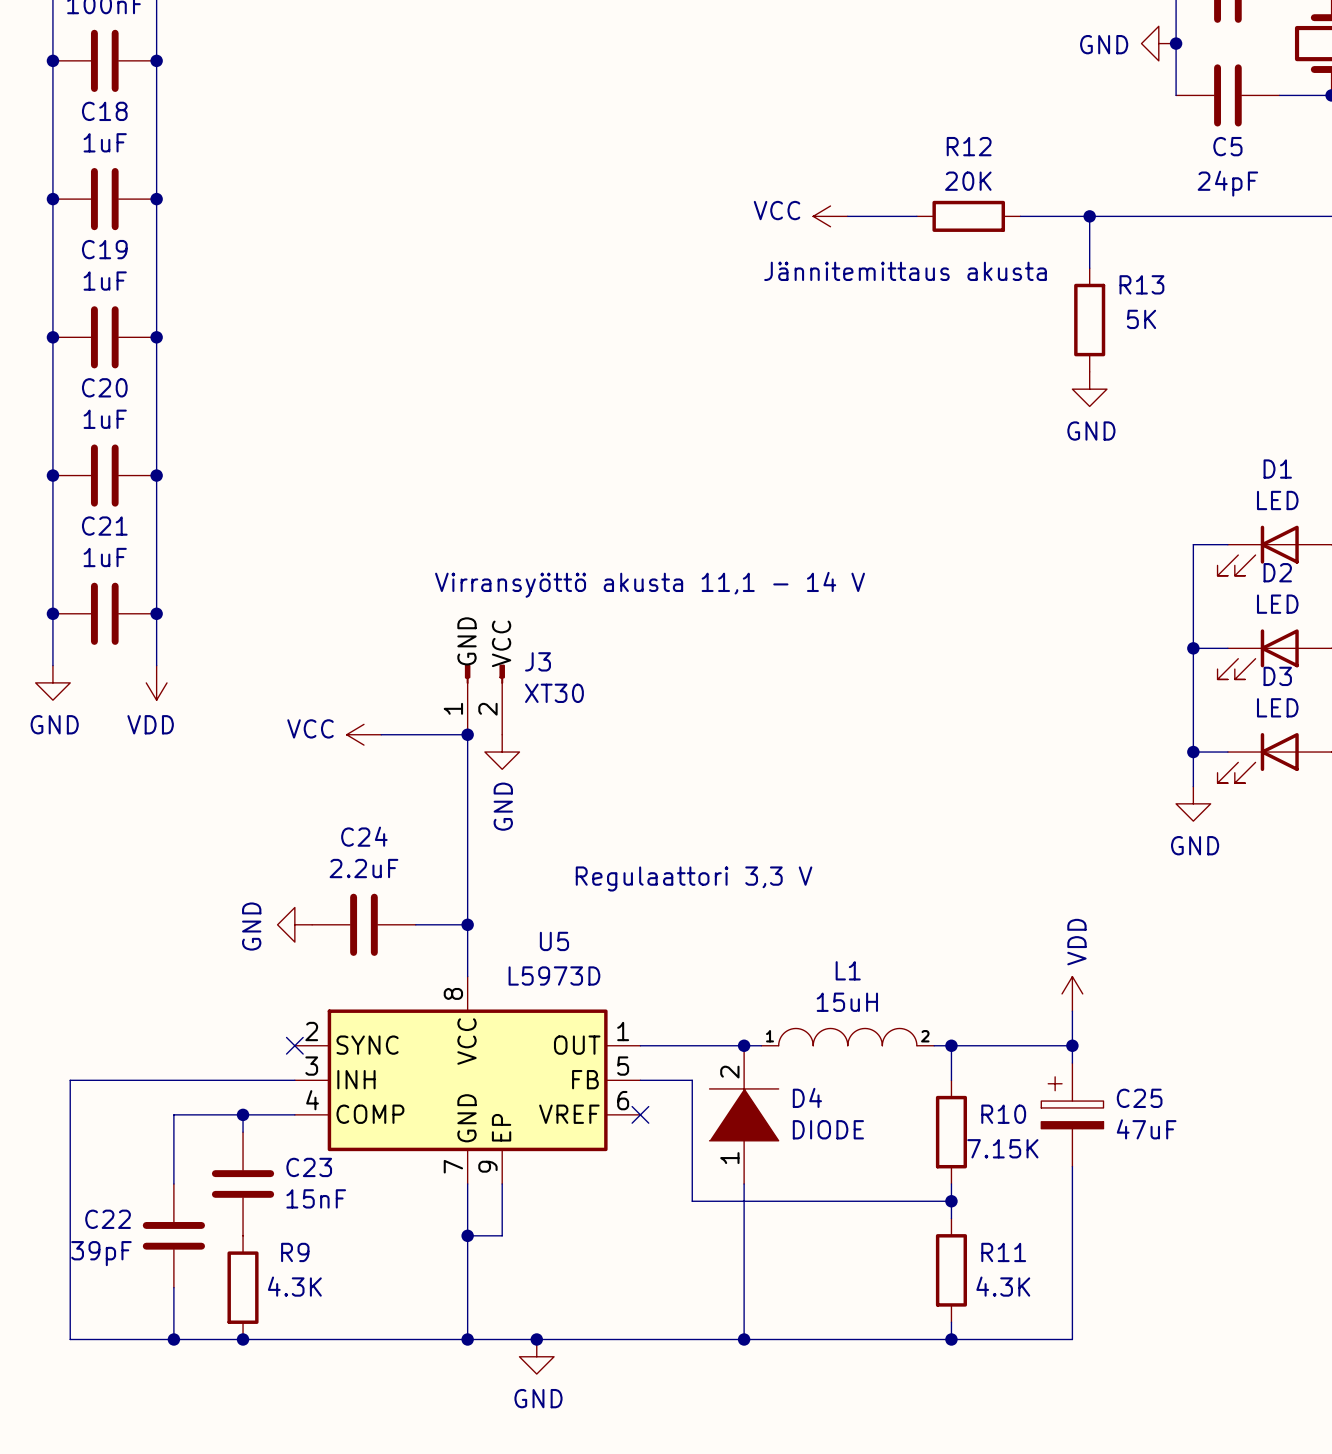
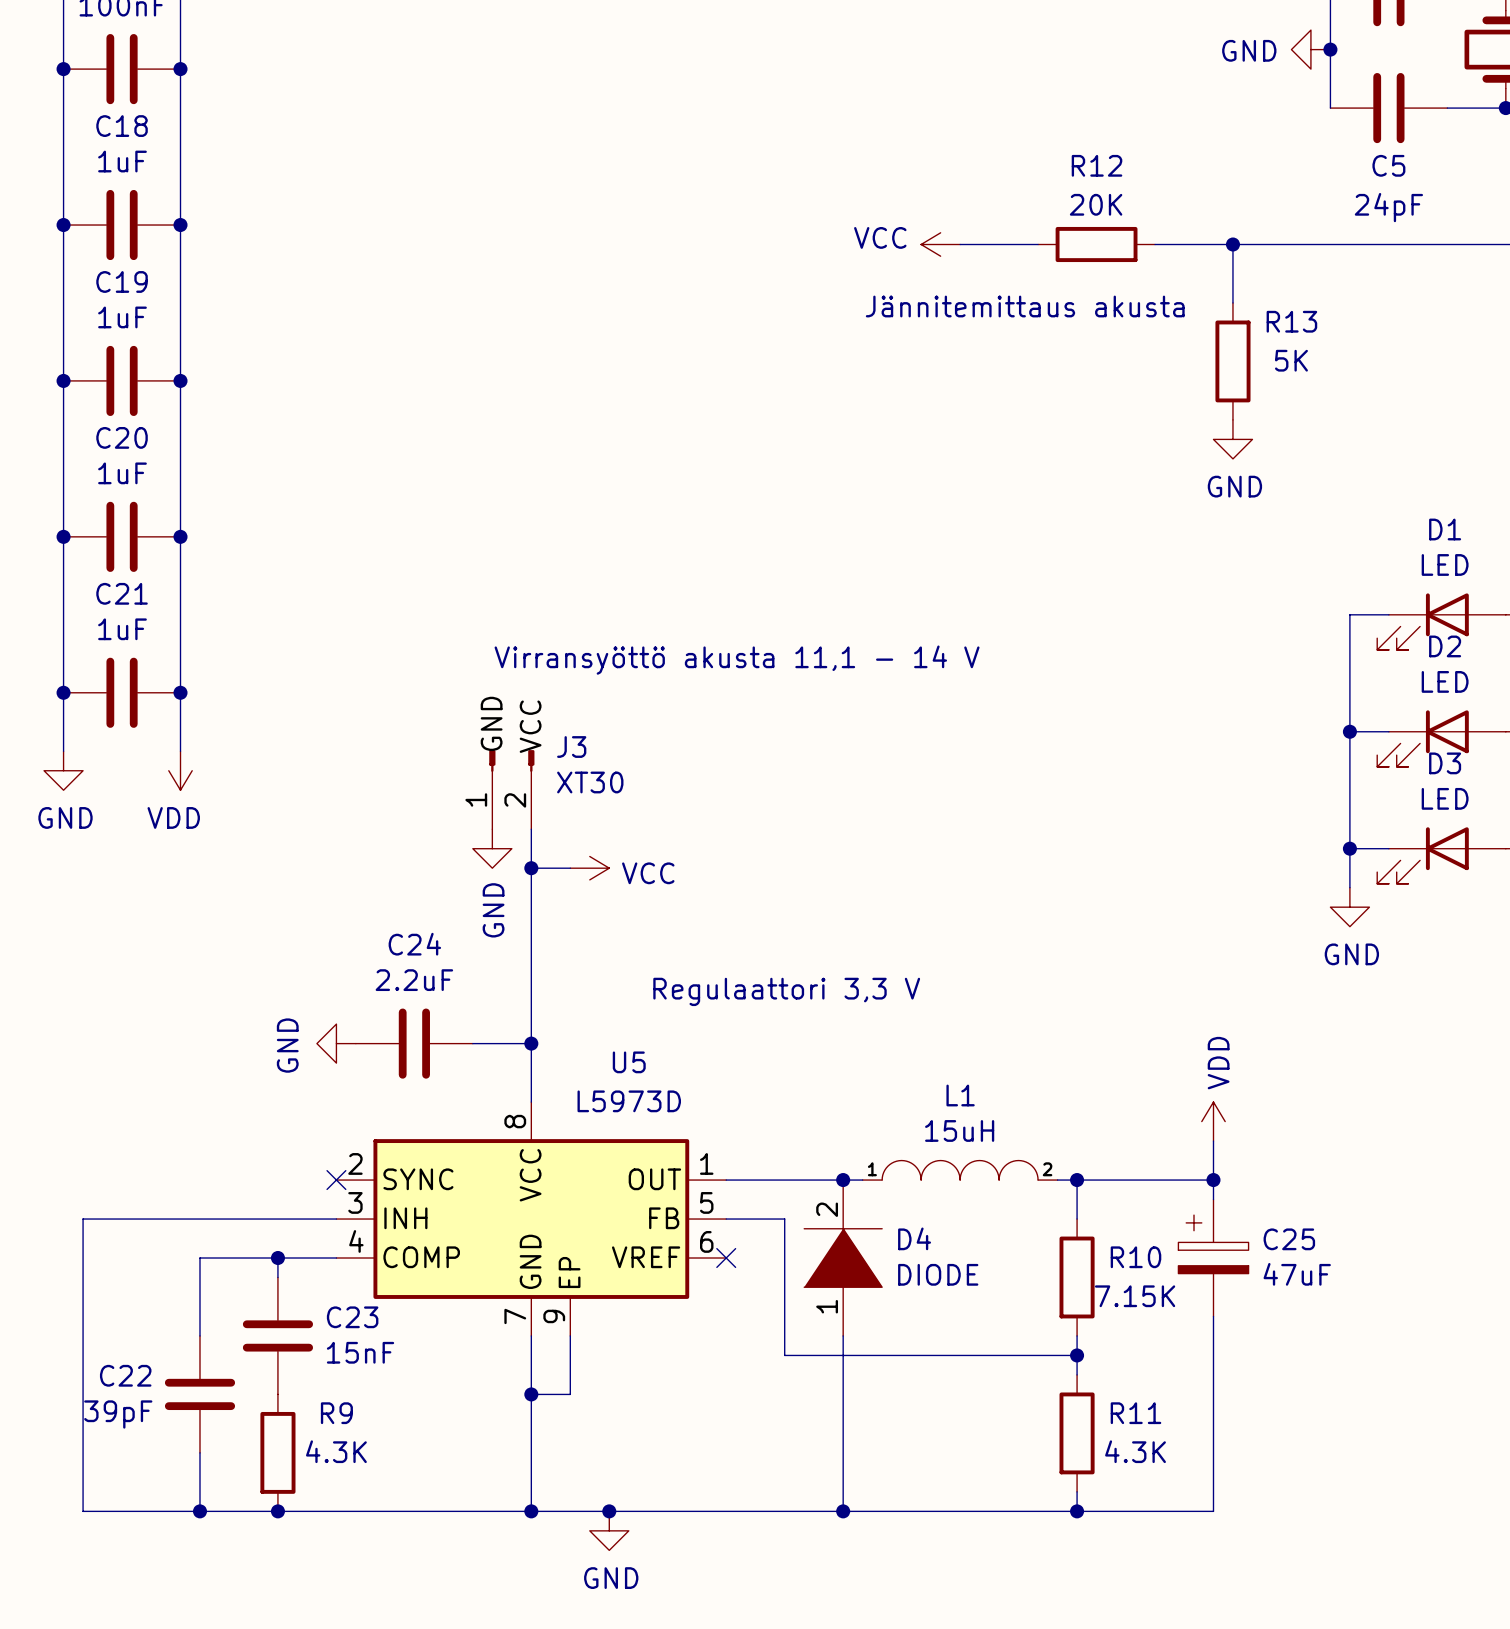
J3 position: (484, 699) -> (511, 789)
power symbol rotation: 0° (363, 734) -> 180° (589, 868)
power symbol position: VCC (363, 734) -> VCC (589, 868)
wire: (381, 734) (467, 734) -> none
junction position: (467, 734) -> (531, 868)
power symbol position: GND (502, 752) -> GND (492, 848)
wire: none -> (531, 868) (570, 868)

